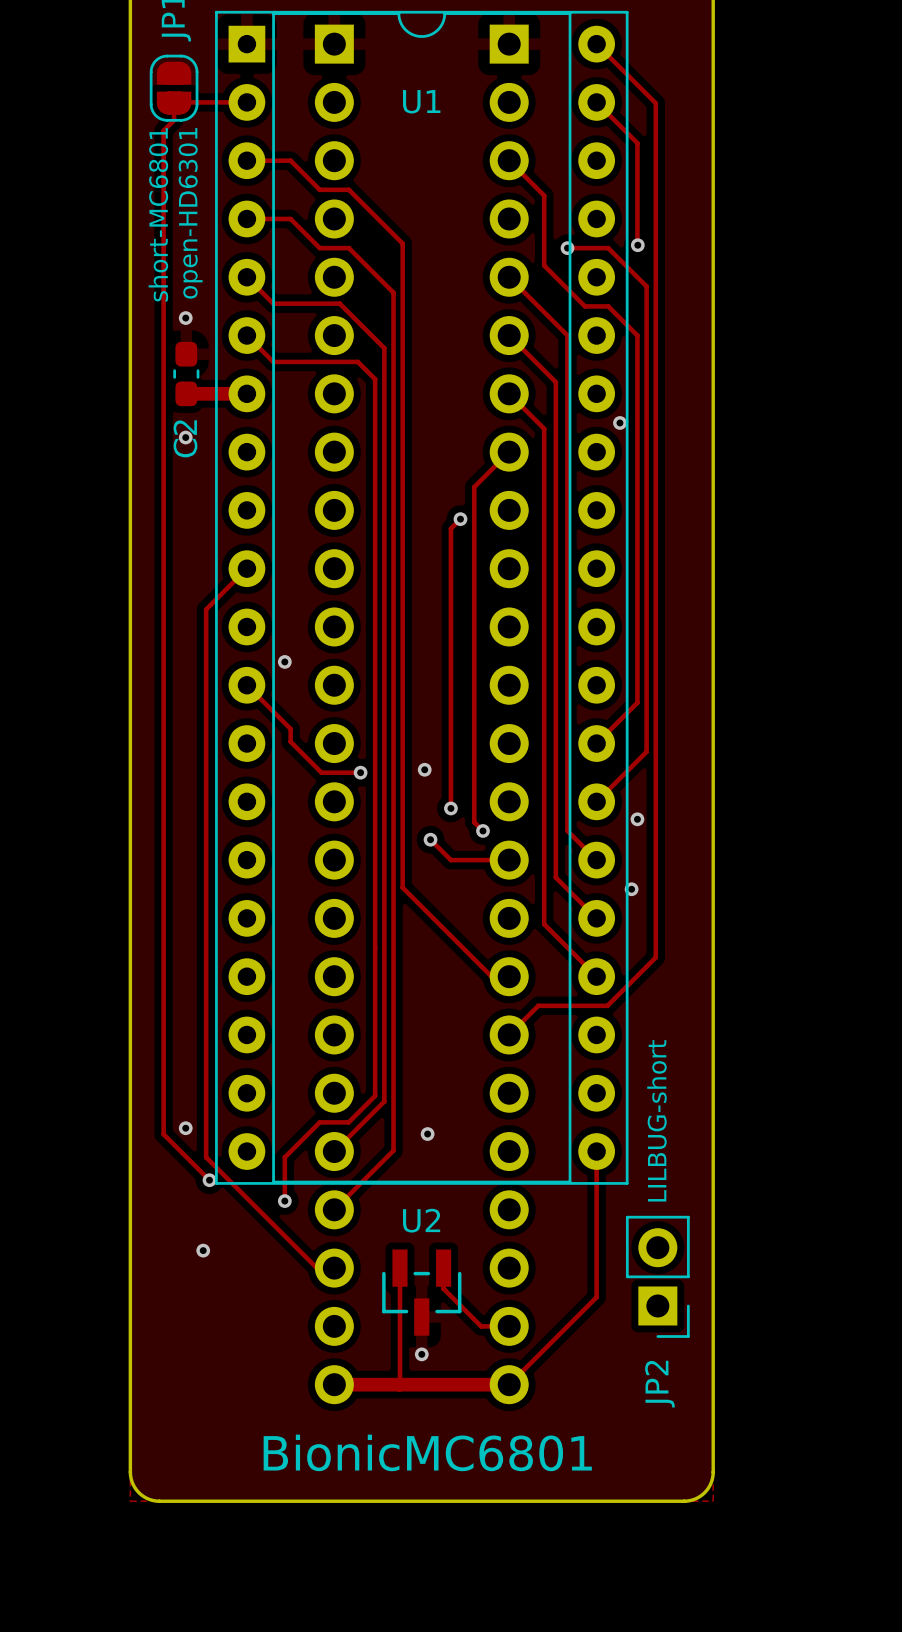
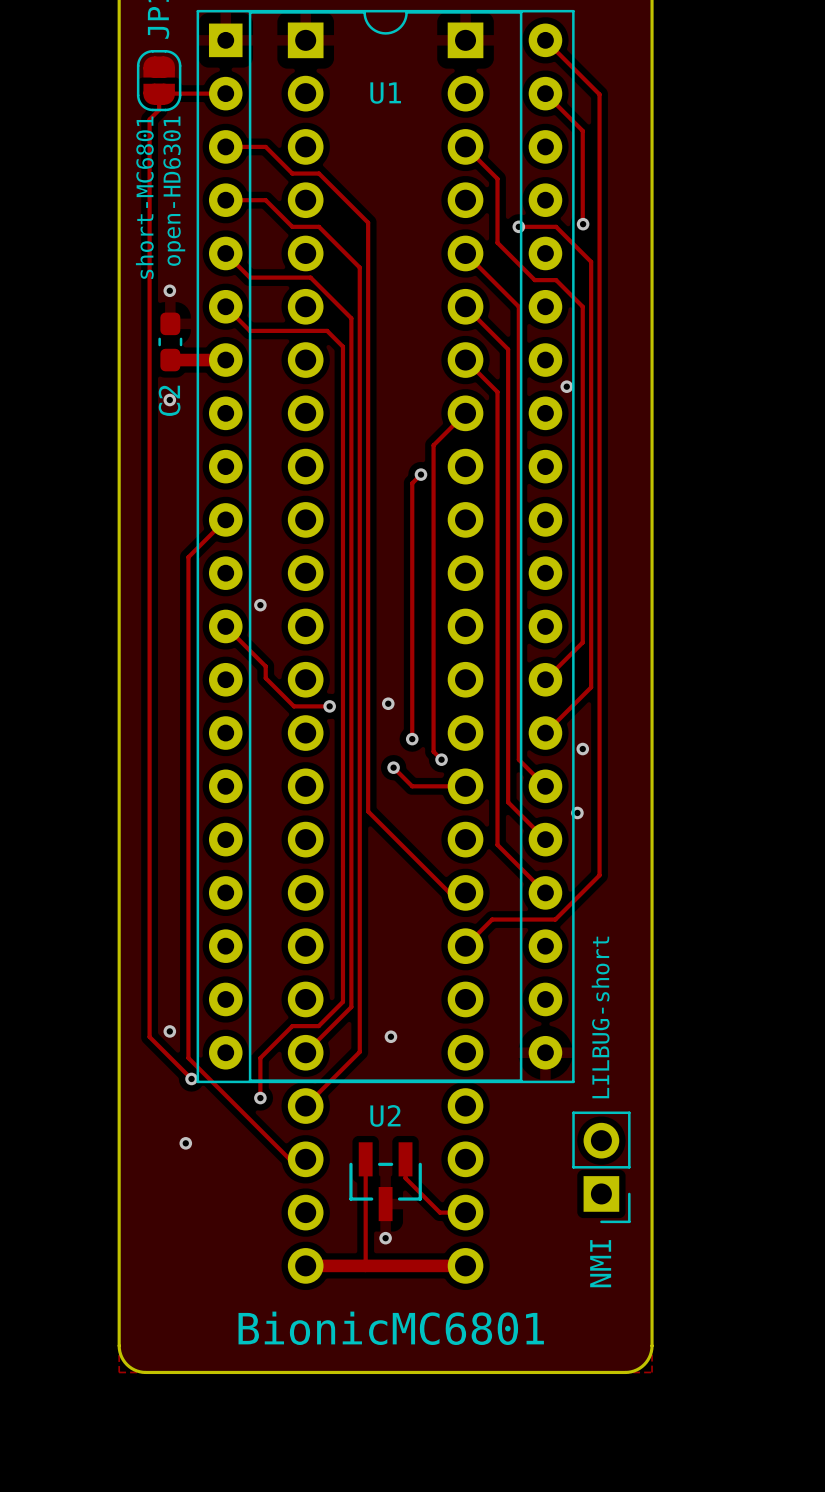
track: (596, 1151) (596, 1297) (509, 1384) -> none
JP2 name: JP2 (659, 1384) -> NMI (600, 1263)

